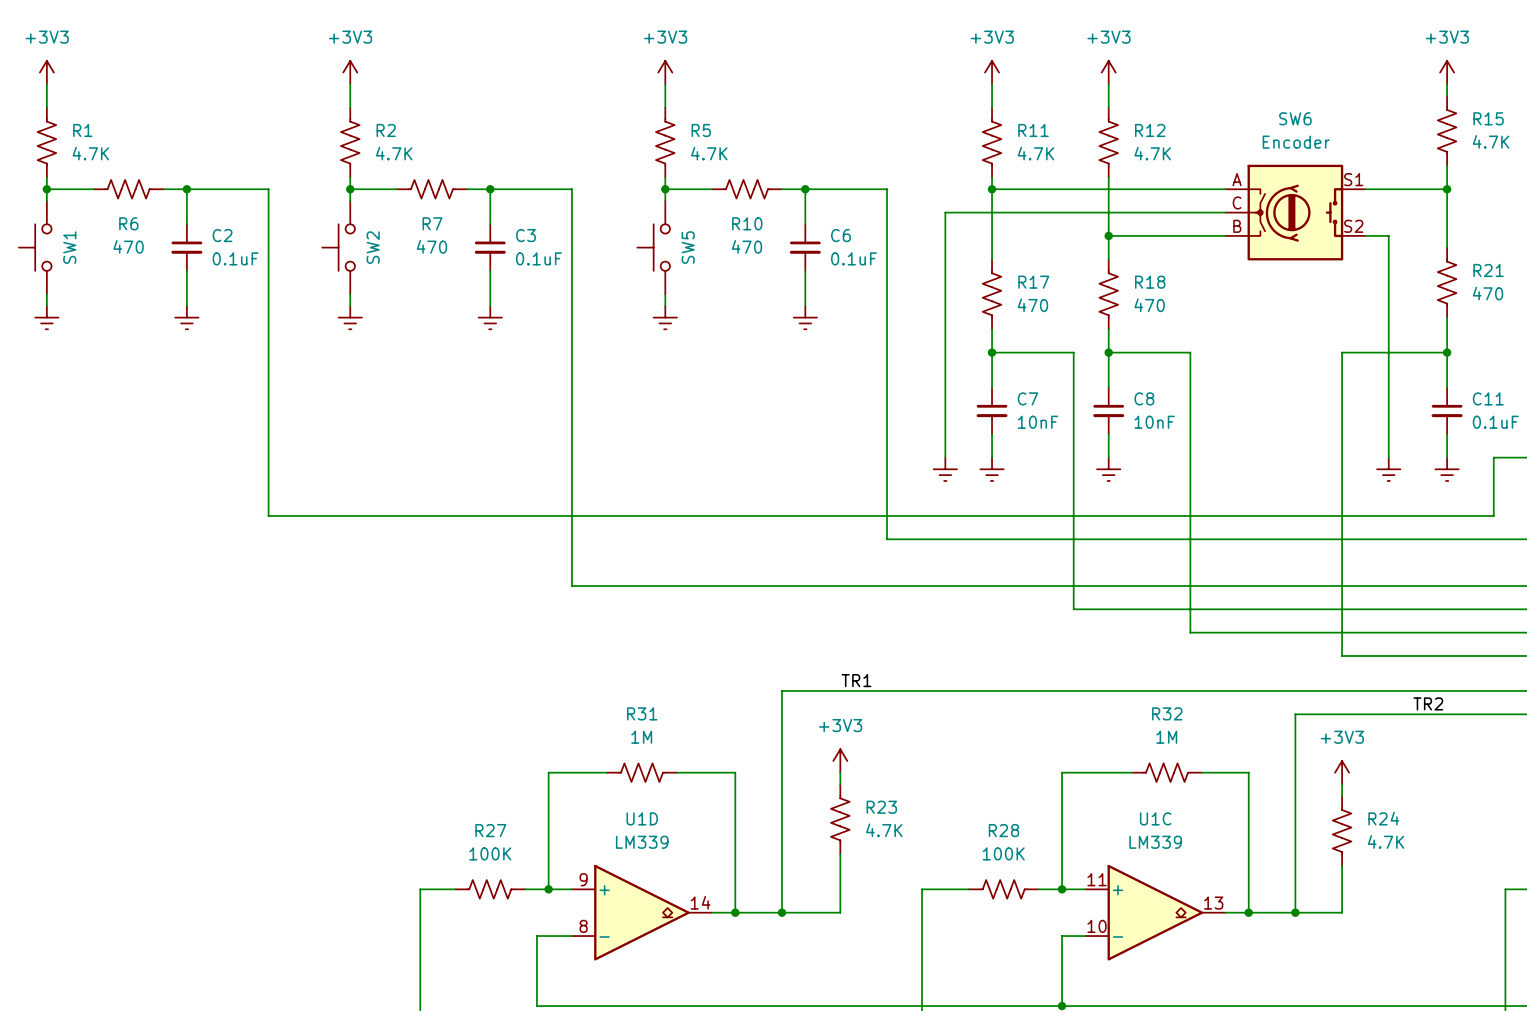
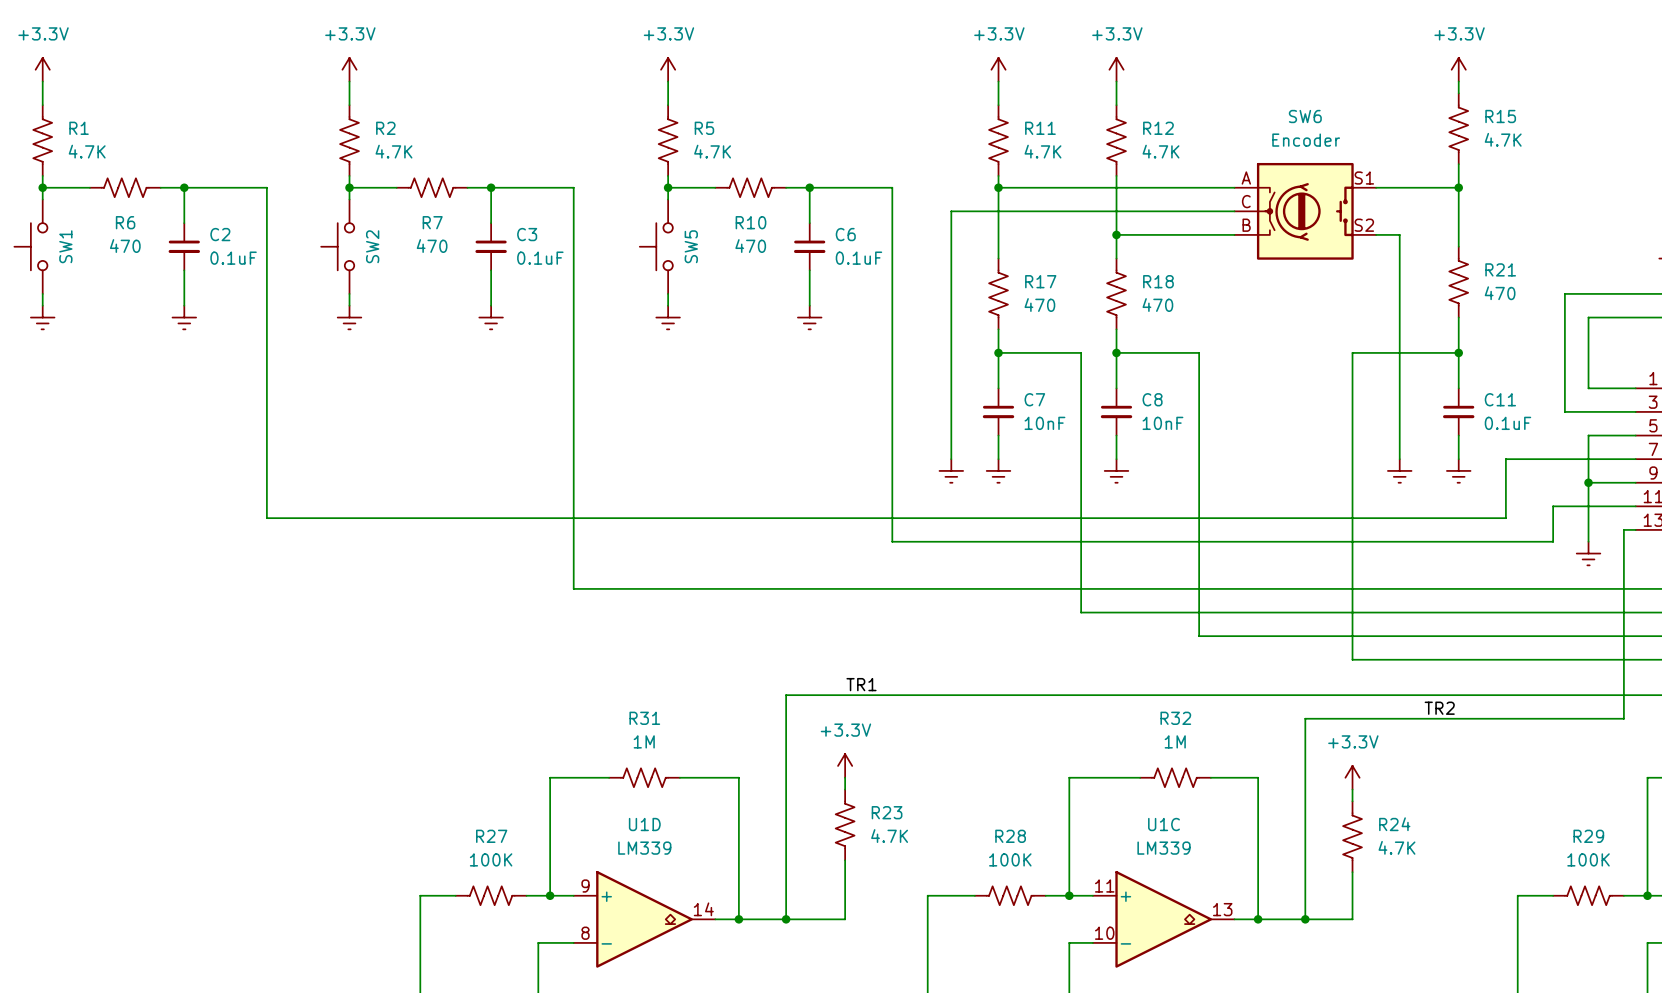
power symbol: +3V3 (46, 72) -> +3.3V (42, 69)
power symbol: +3V3 (350, 72) -> +3.3V (349, 69)
power symbol: +3V3 (665, 72) -> +3.3V (668, 69)
power symbol: +3V3 (992, 72) -> +3.3V (998, 69)
power symbol: +3V3 (1108, 72) -> +3.3V (1116, 69)
power symbol: +3V3 (1447, 72) -> +3.3V (1458, 69)
power symbol: +3V3 (840, 761) -> +3.3V (845, 765)
power symbol: +3V3 (1342, 772) -> +3.3V (1352, 777)

